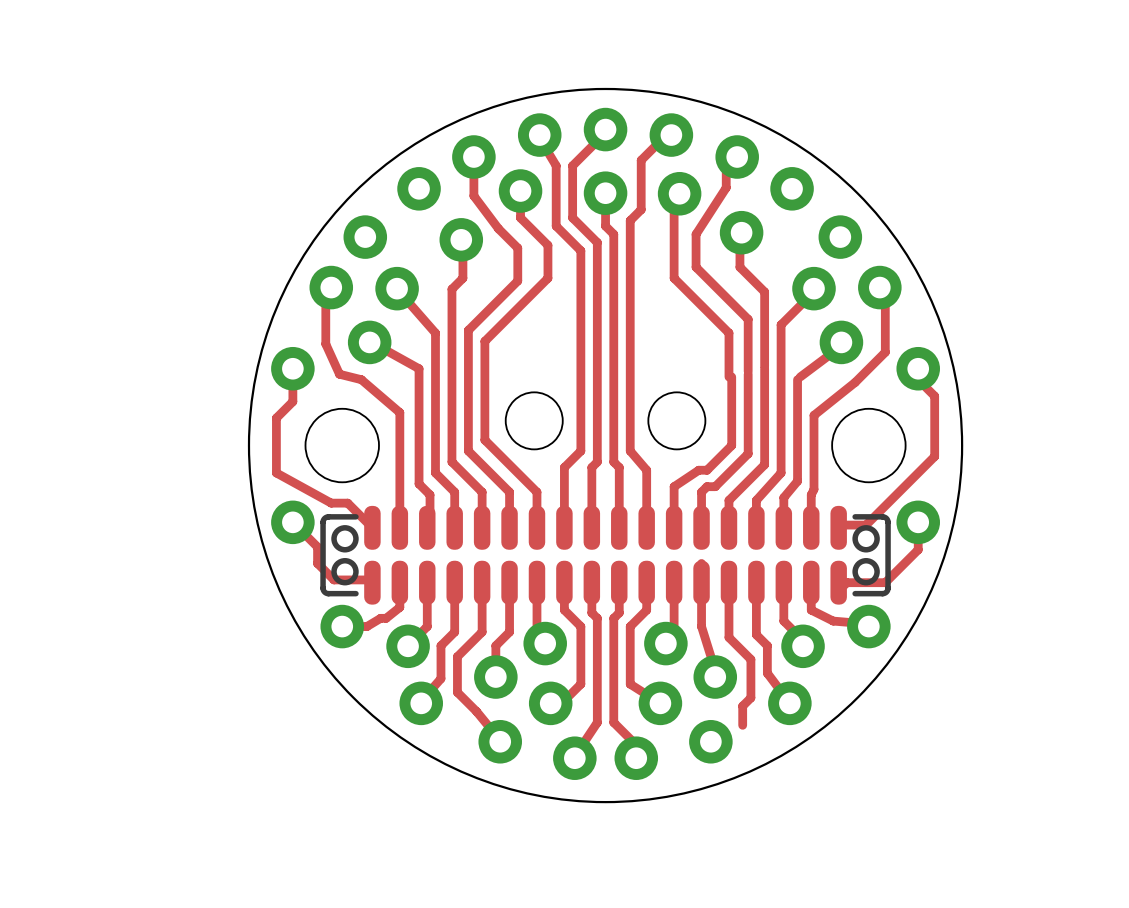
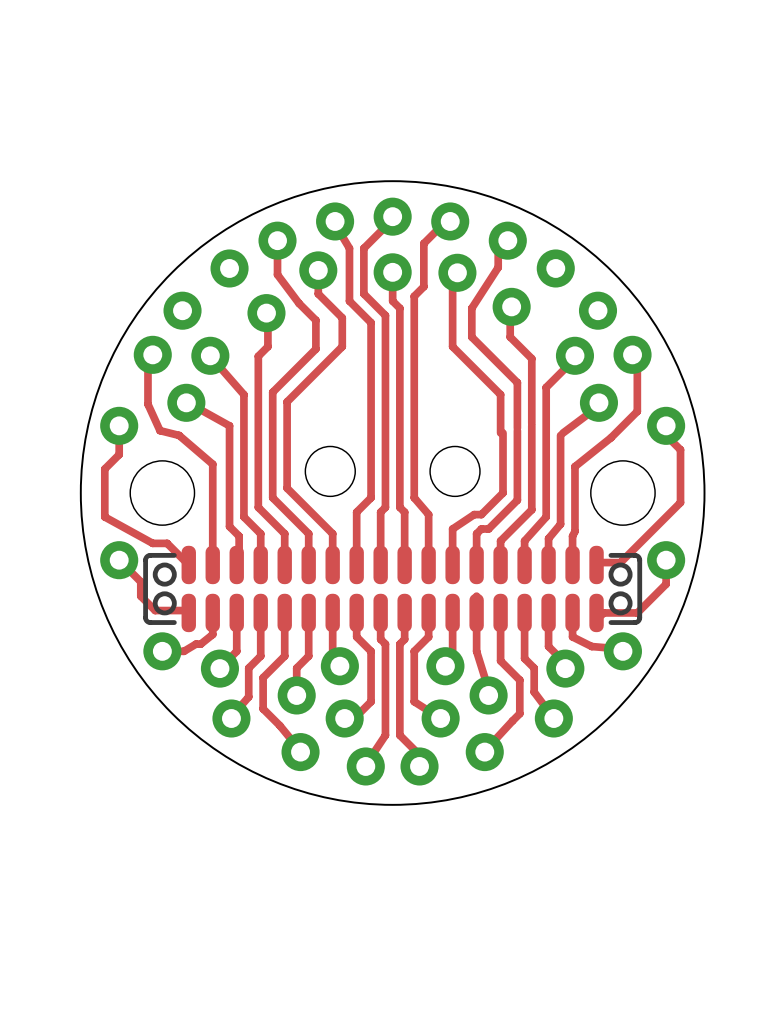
track: (742, 706) (742, 725) -> (512, 720) (483, 752)

